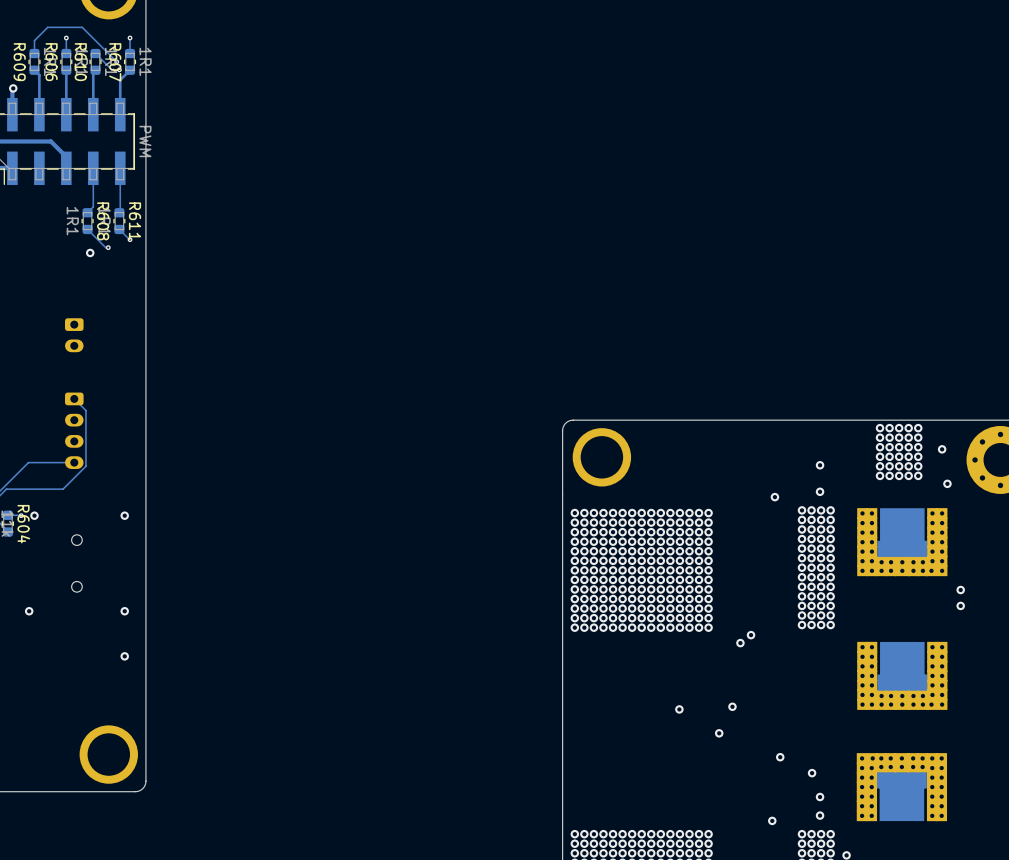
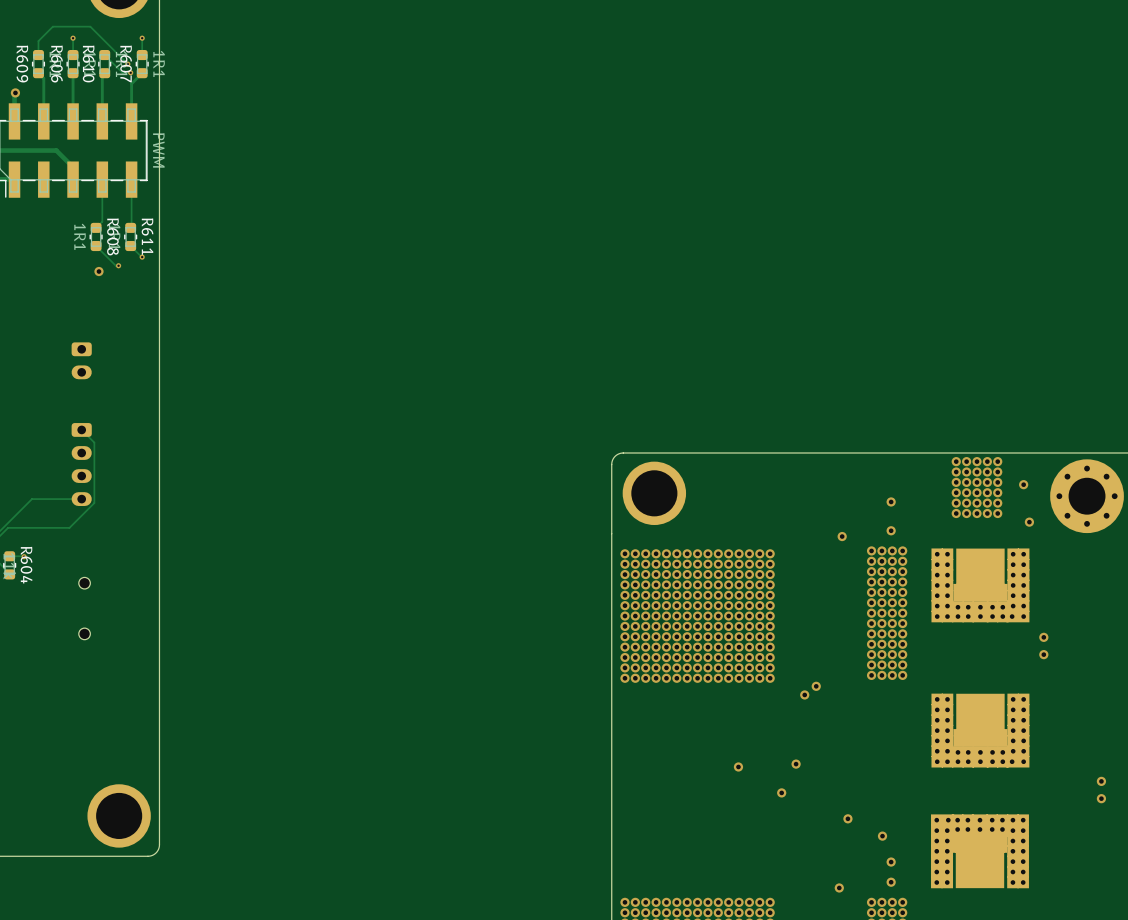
via: (34, 515) -> none
via: (124, 515) -> none
via: (29, 611) -> none
via: (124, 611) -> none
via: (124, 656) -> none

